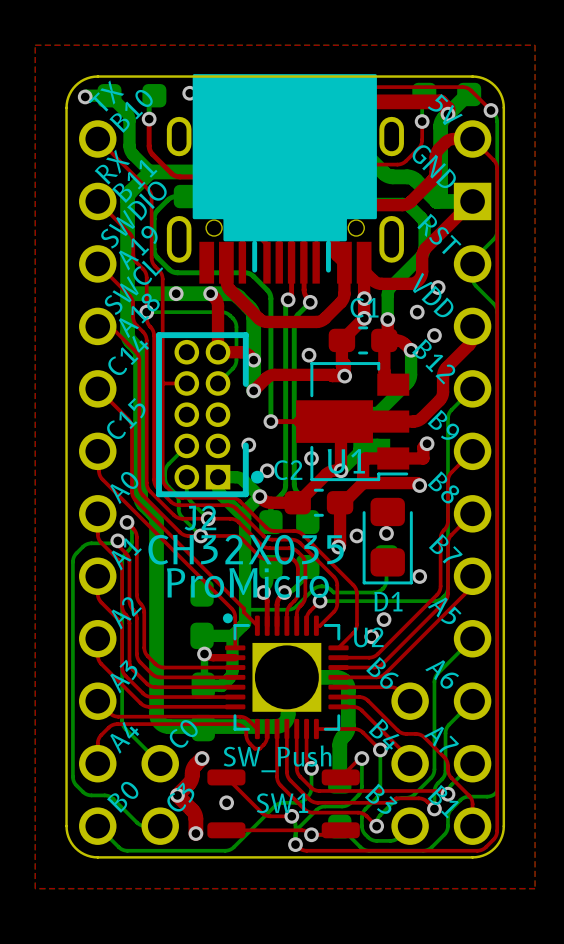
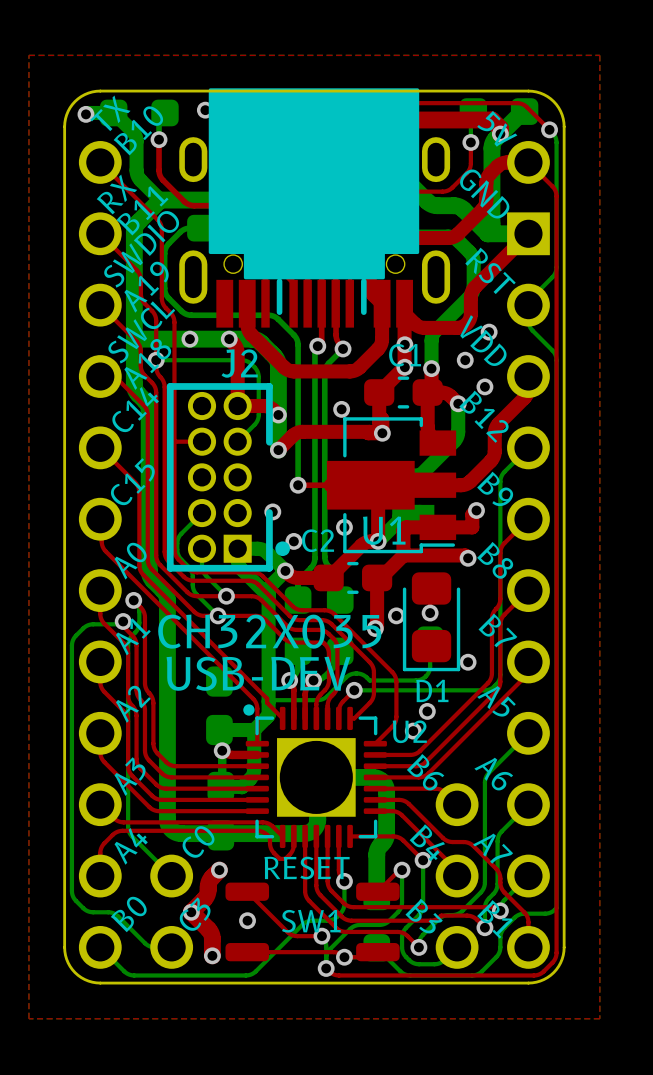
J2 name position: J2 (200, 518) -> J2 (239, 363)
text: ProMicro (247, 582) -> USB-DEV (258, 673)
SW1 value: SW_Push (277, 758) -> RESET (307, 868)

